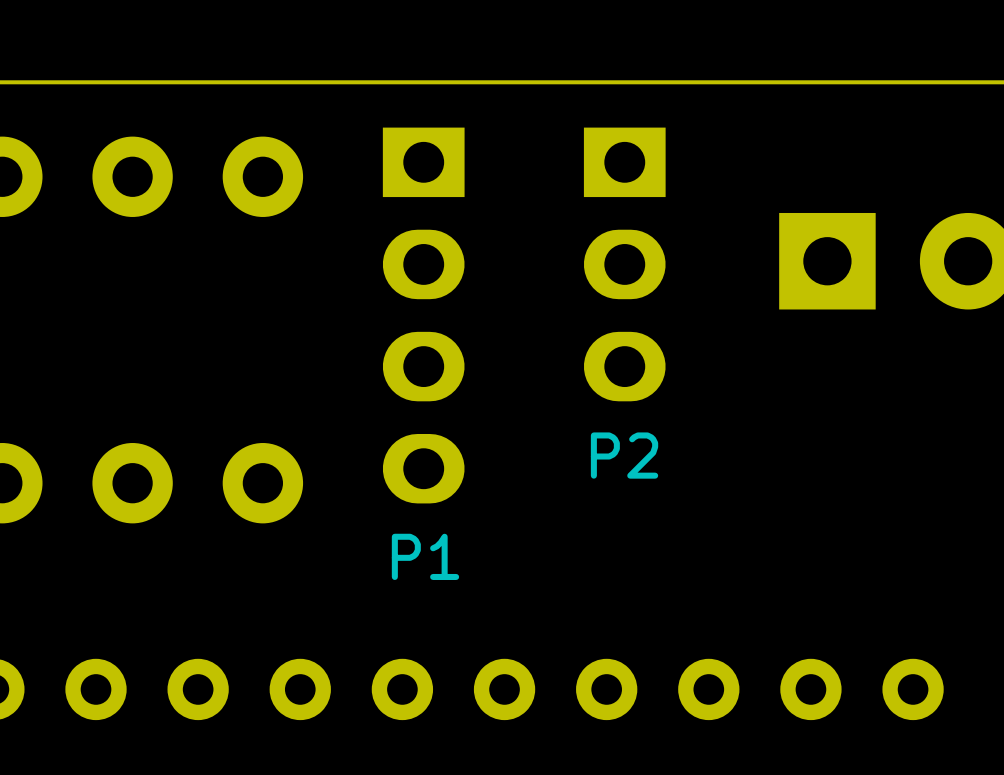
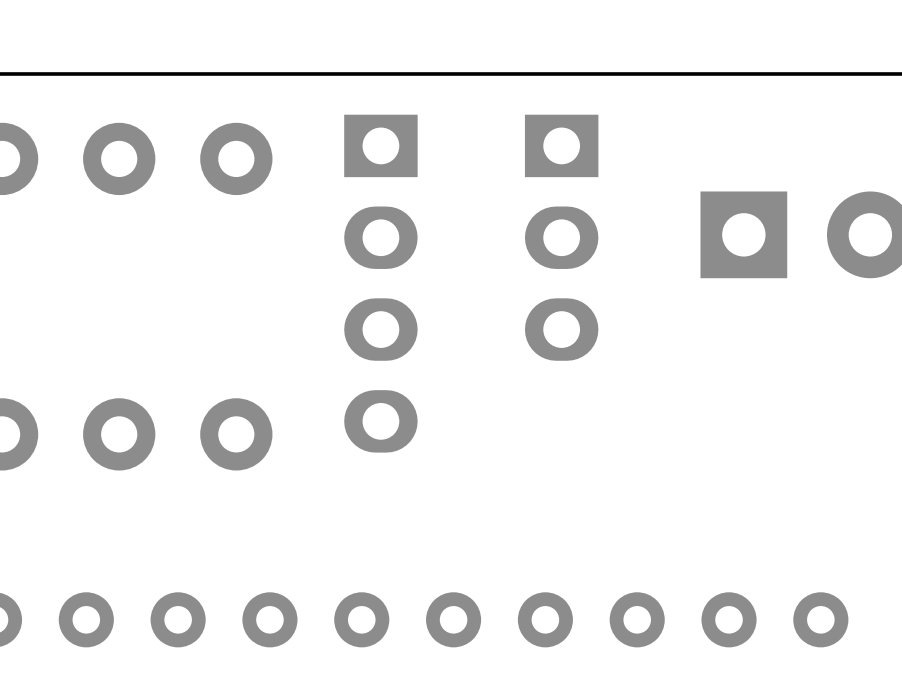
P2 name: P2 (624, 455) -> none
P1 name: P1 (425, 556) -> none

